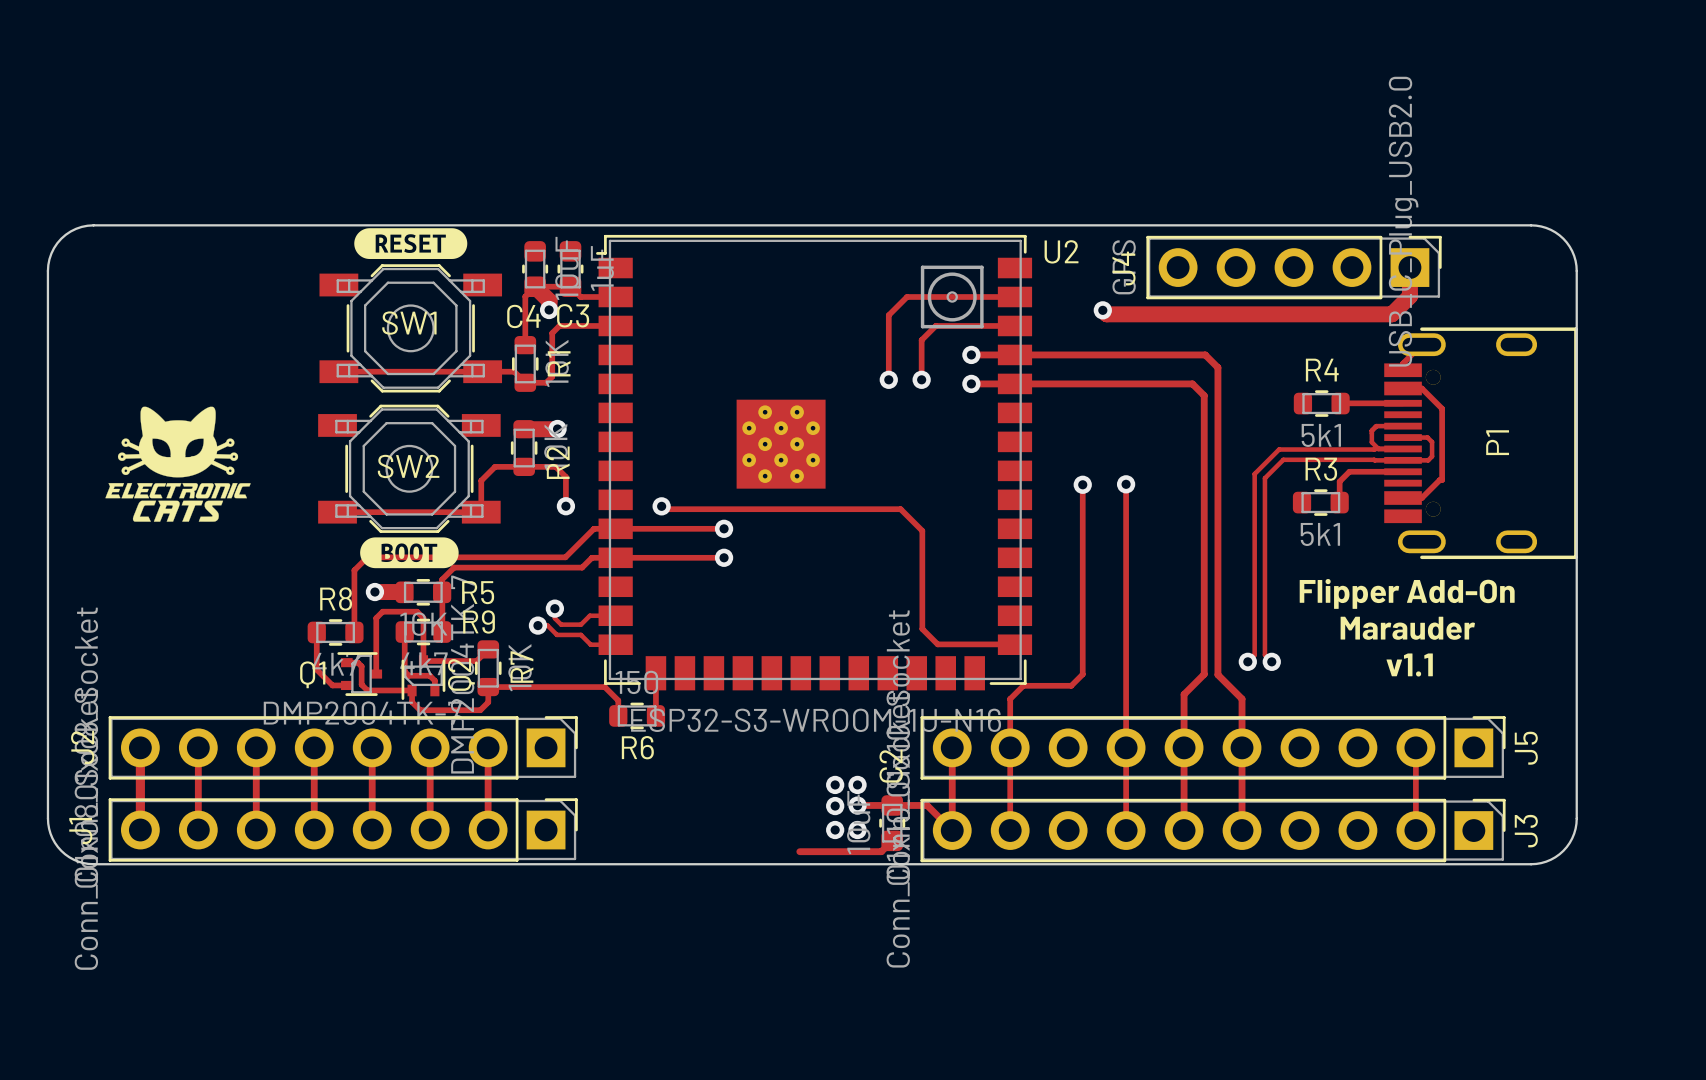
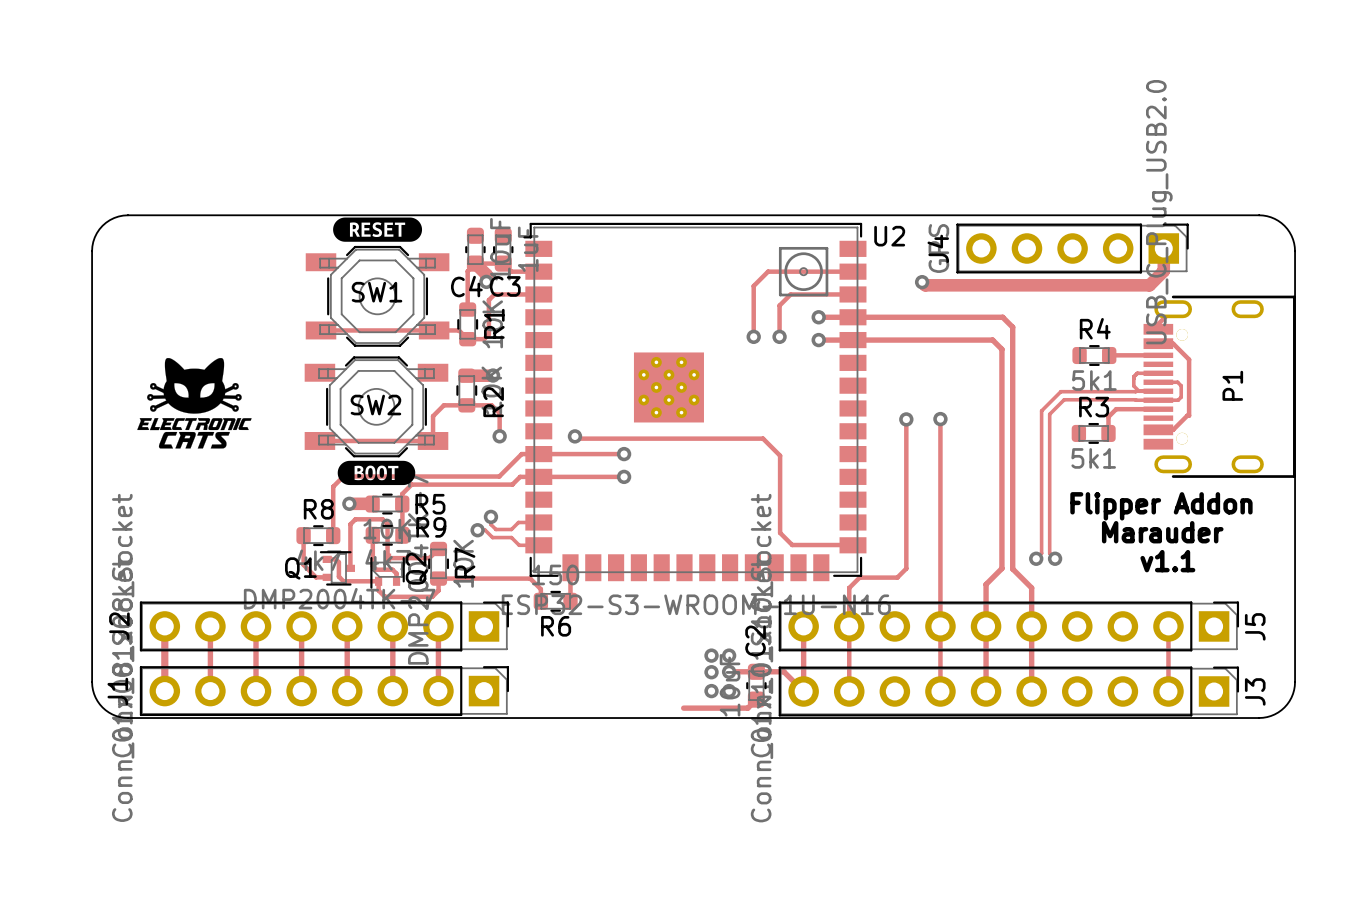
text: Flipper Add-On (1407, 593) -> Flipper Addon (1161, 506)

